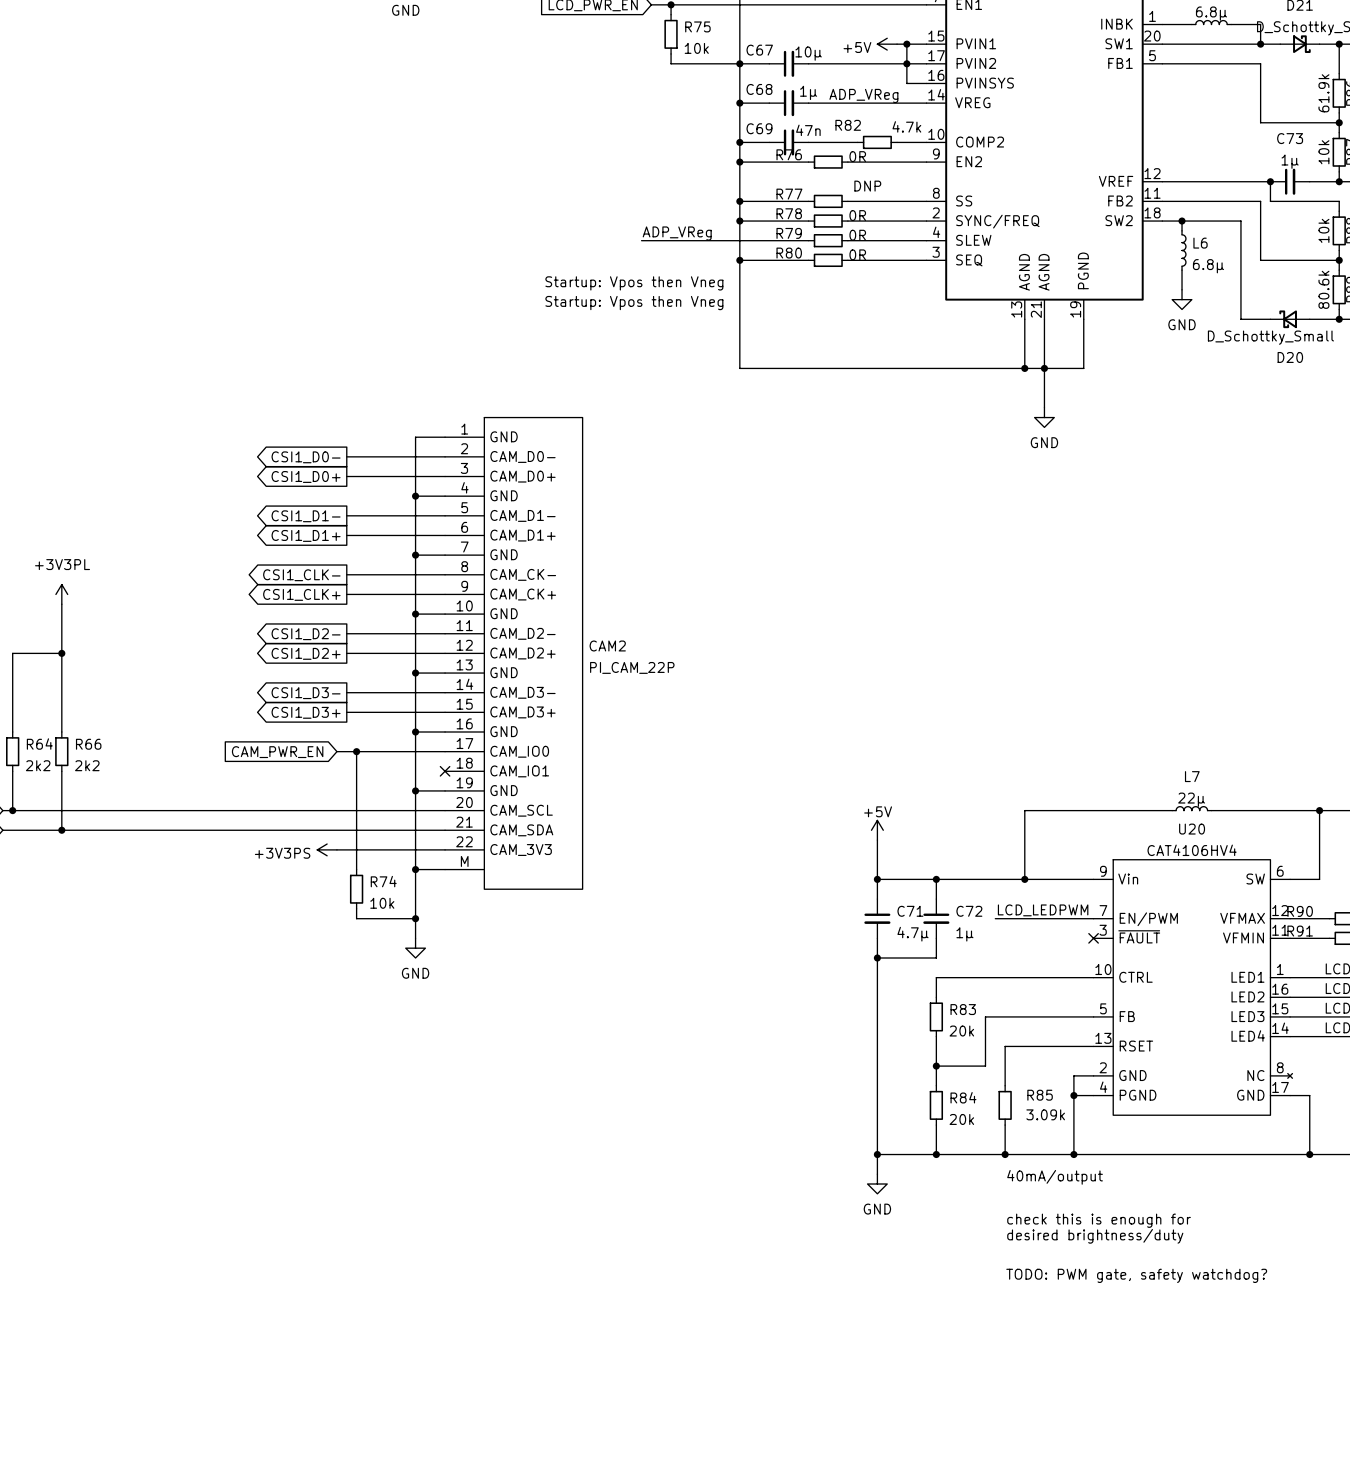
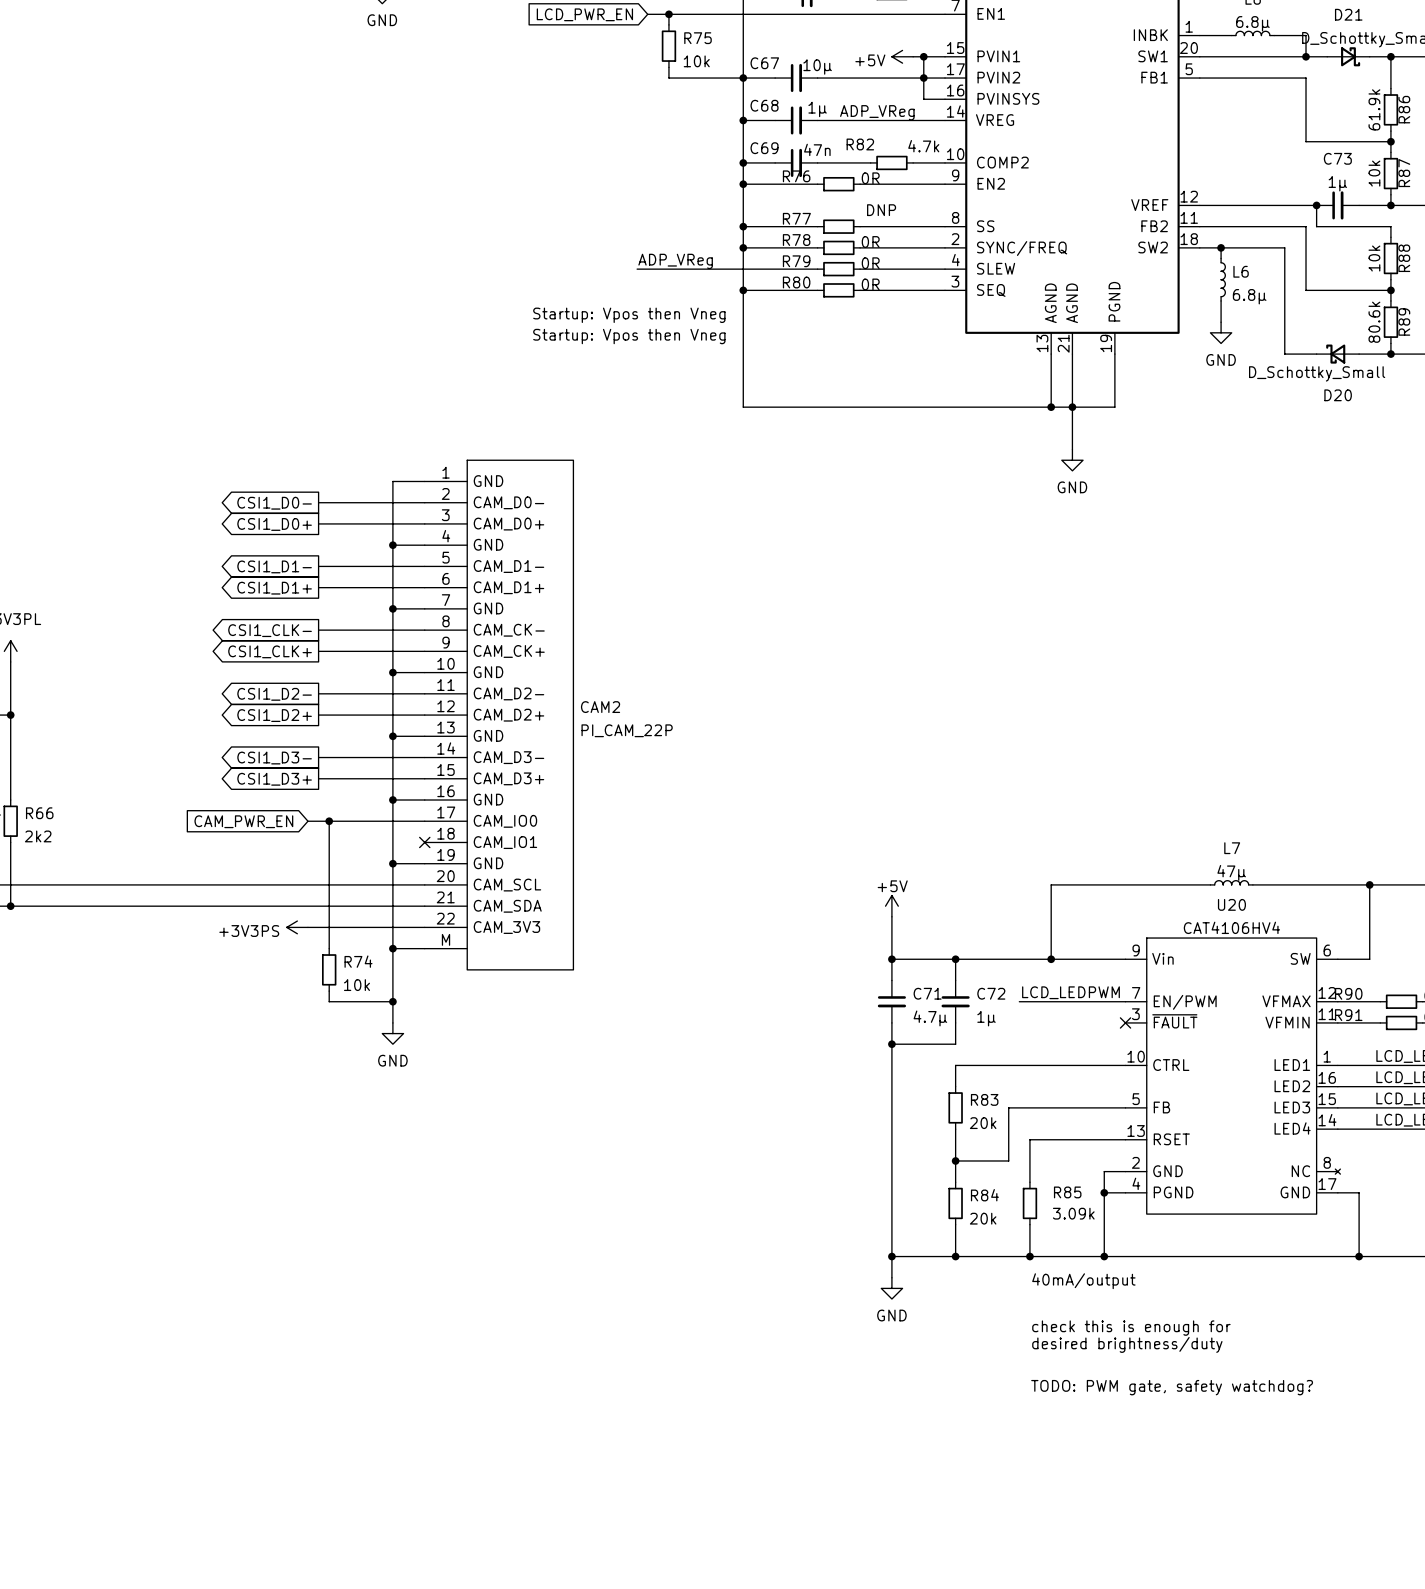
L7 value: 22µ (1191, 799) -> 47µ (1231, 872)

